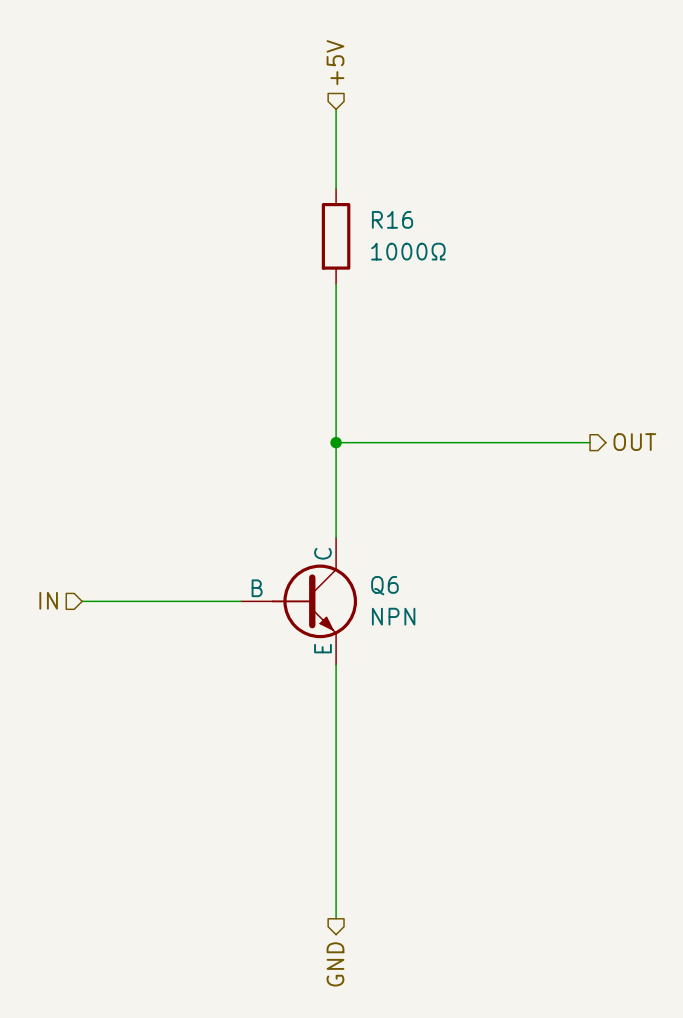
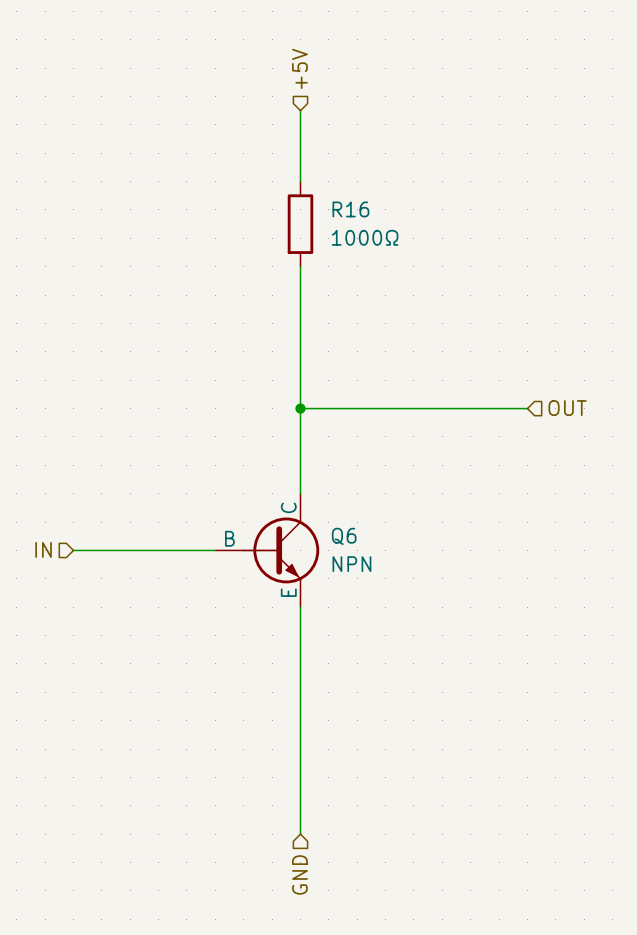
hierarchical label shape: output (634, 442) -> input (567, 408)
hierarchical label shape: output (335, 964) -> input (299, 874)

